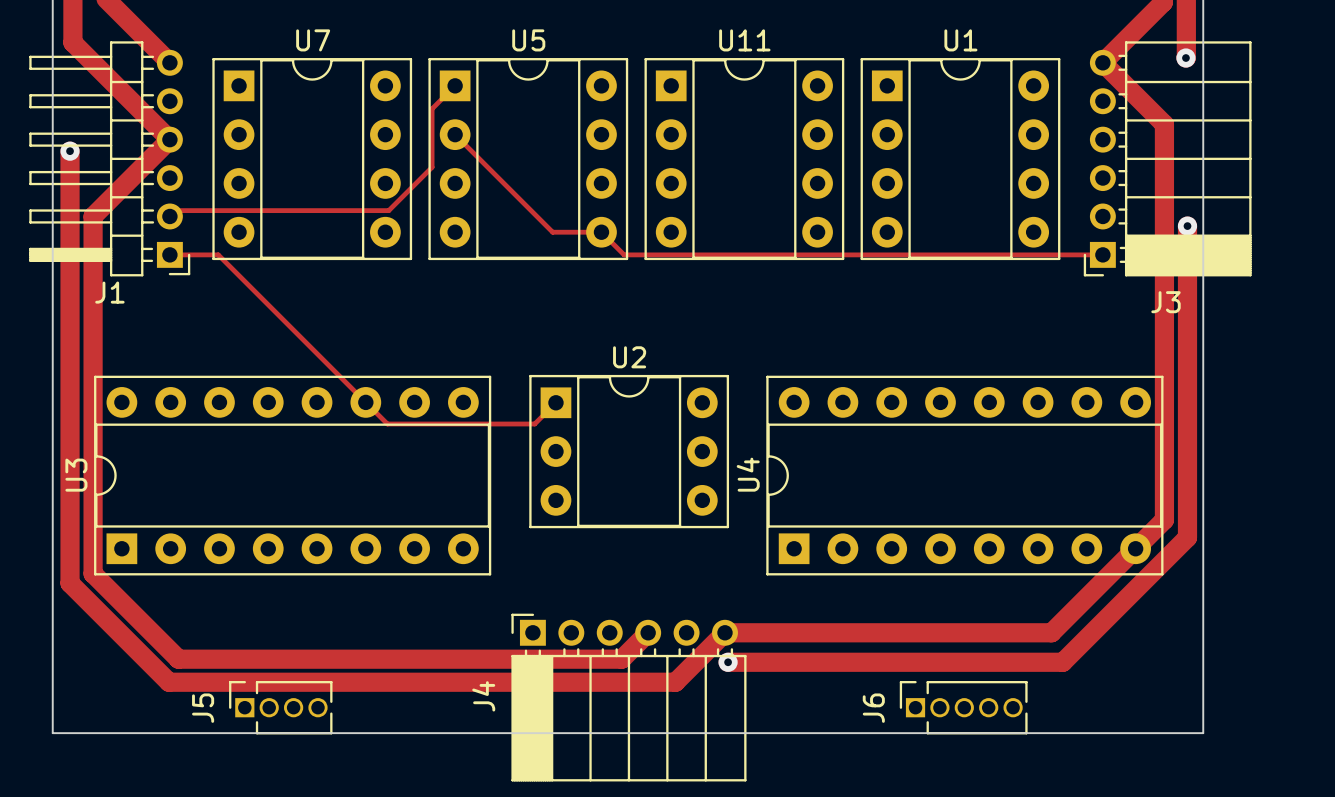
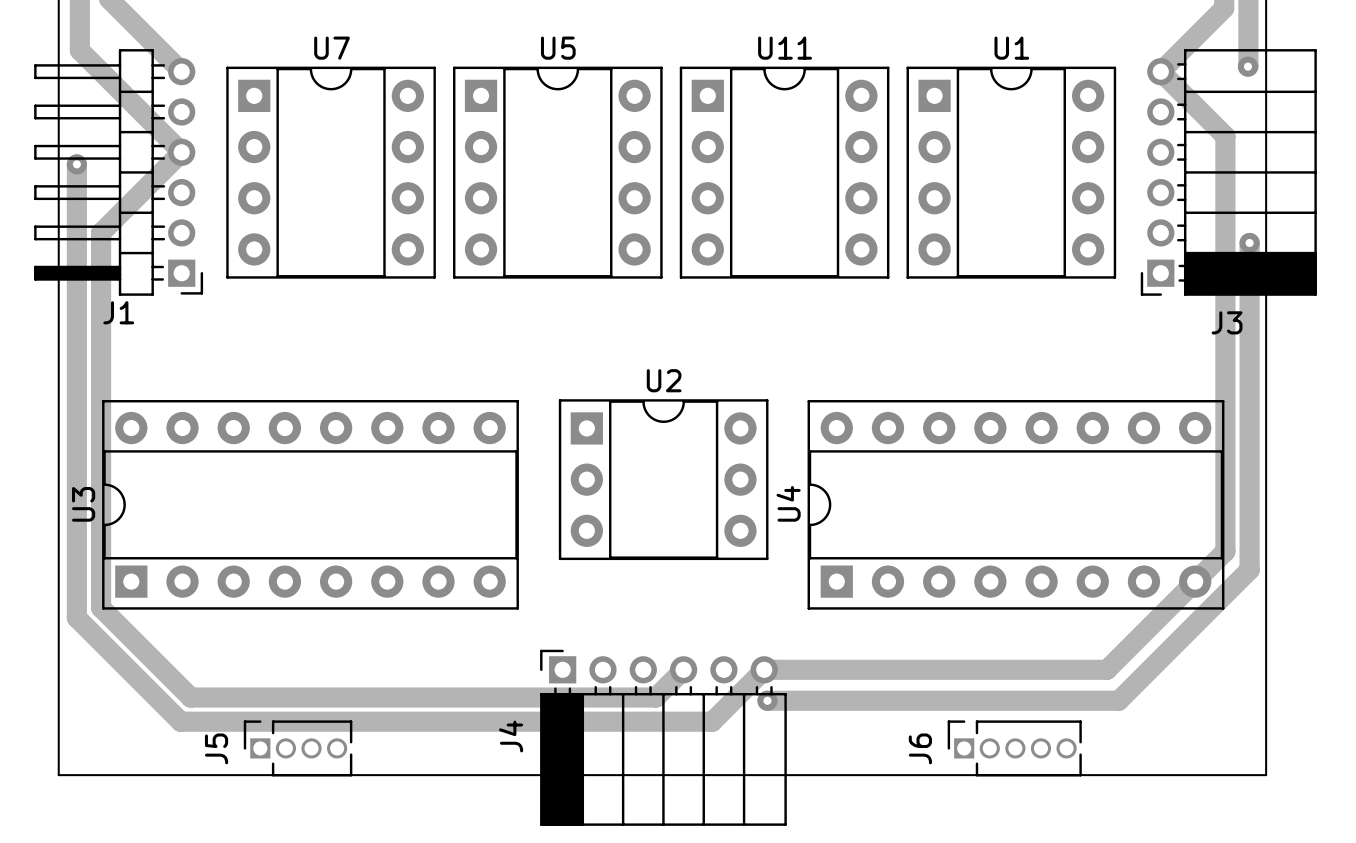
track: (455, 73) (455, 85) (432, 108) (432, 167) (388, 210) (175, 210) (169, 216) -> none
track: (455, 134) (552, 232) (601, 232) (624, 254) (1102, 254) -> none
track: (169, 254) (218, 254) (387, 424) (534, 424) (555, 402) -> none

